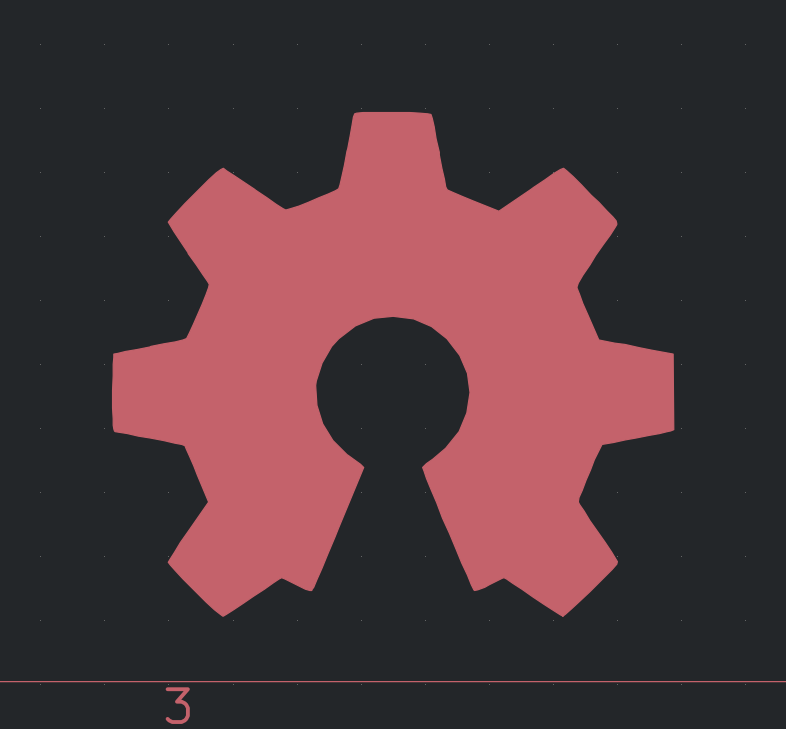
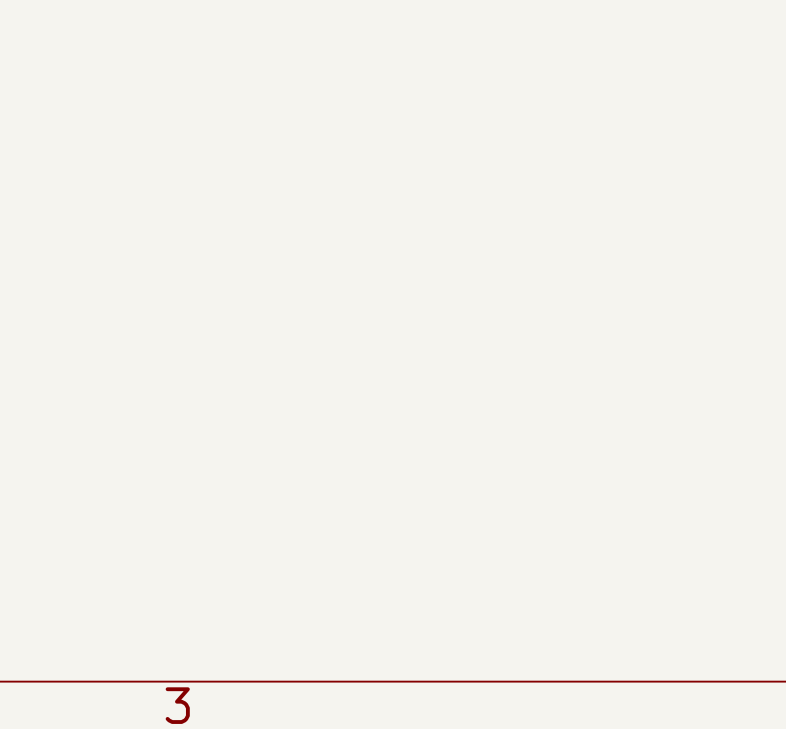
power symbol: (393, 364) -> none

